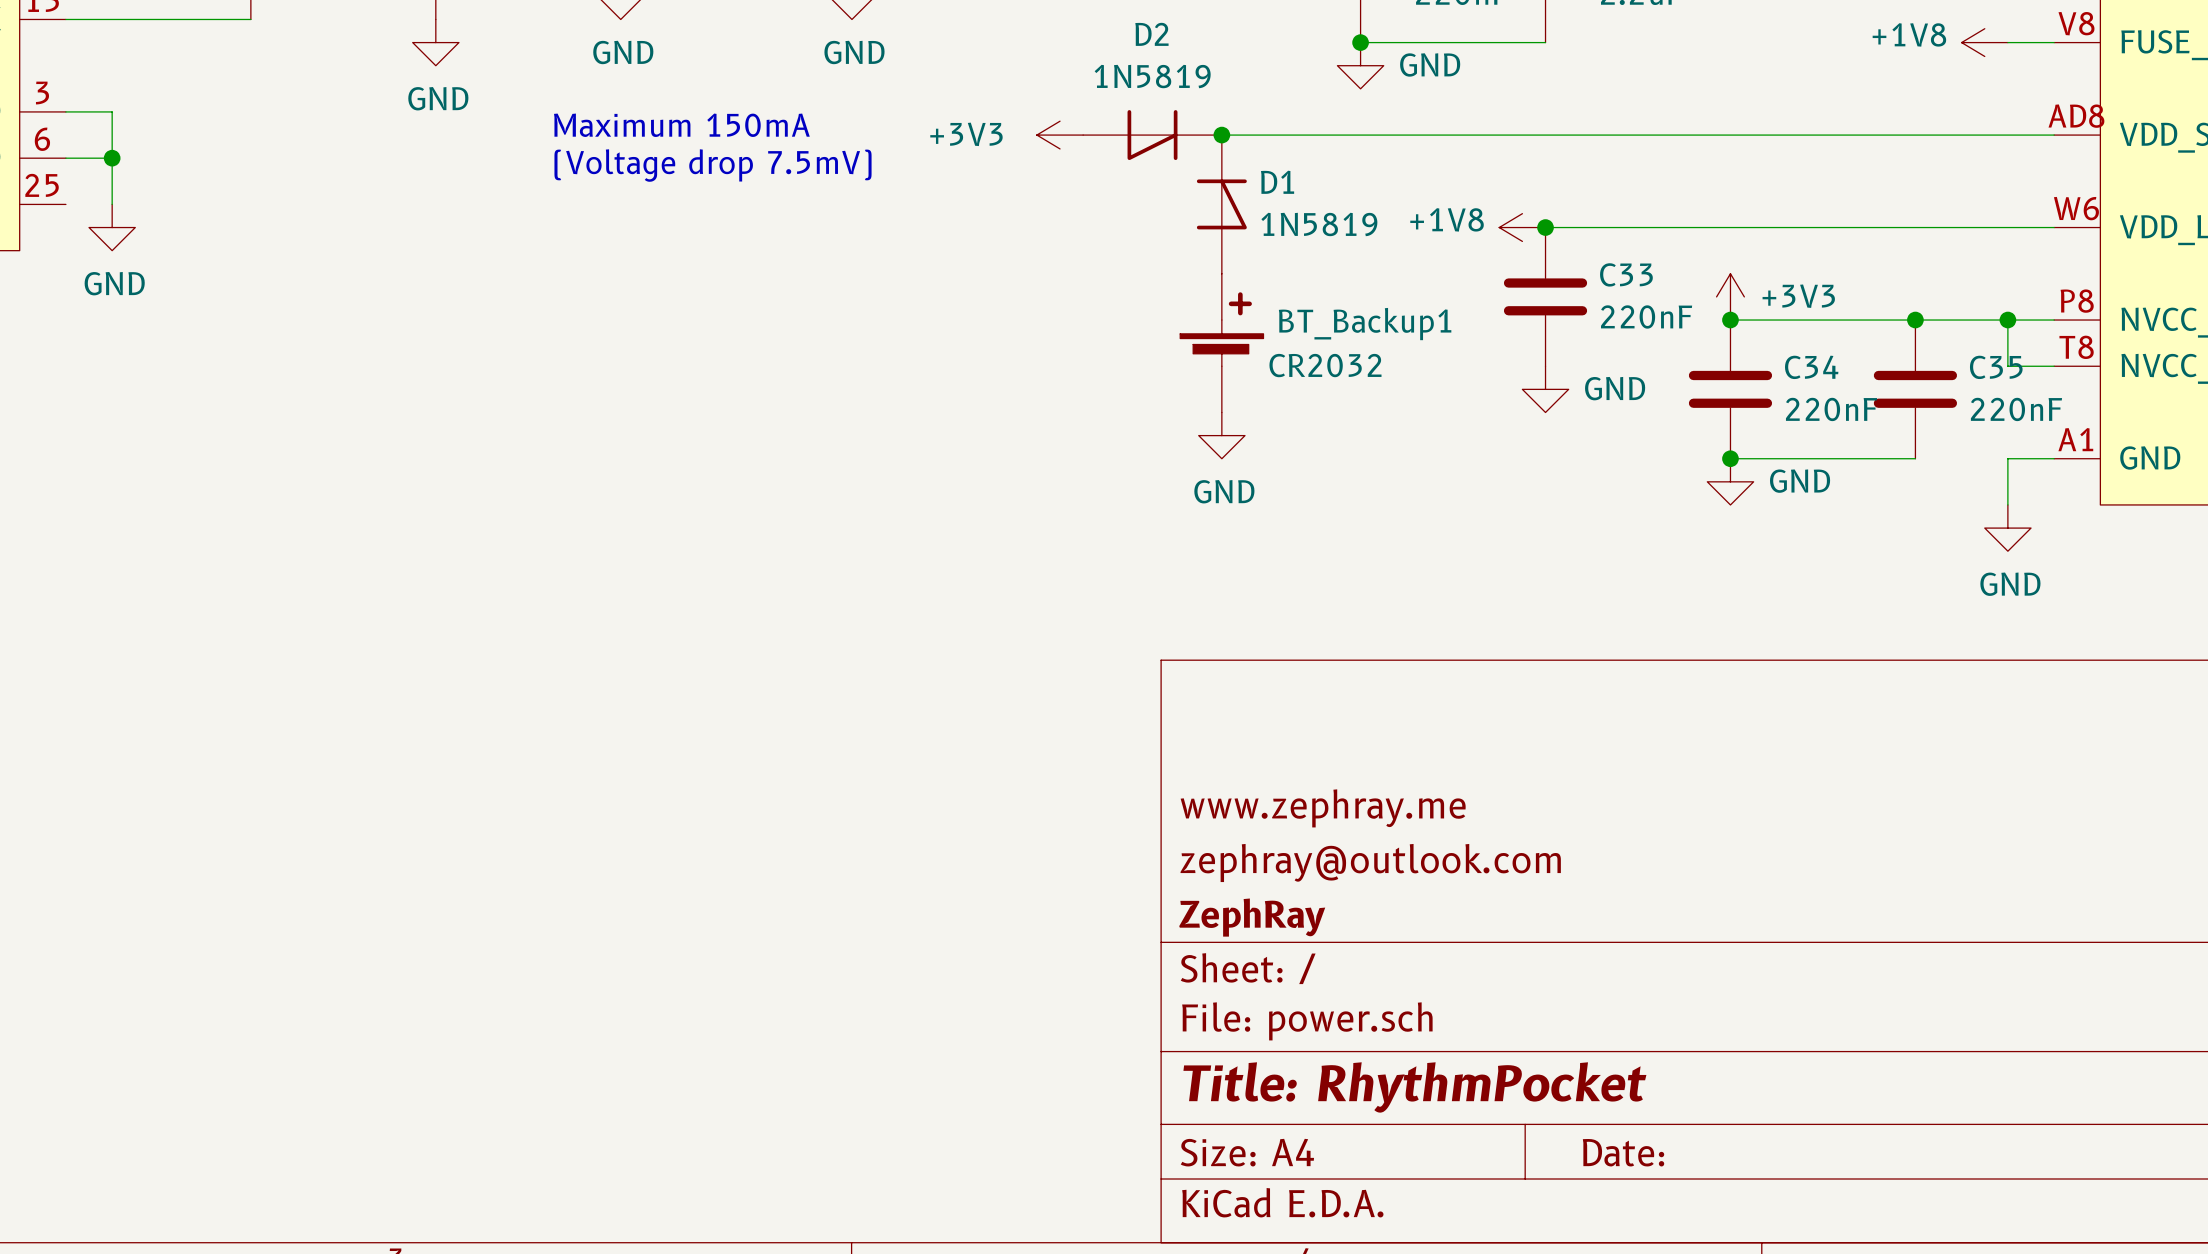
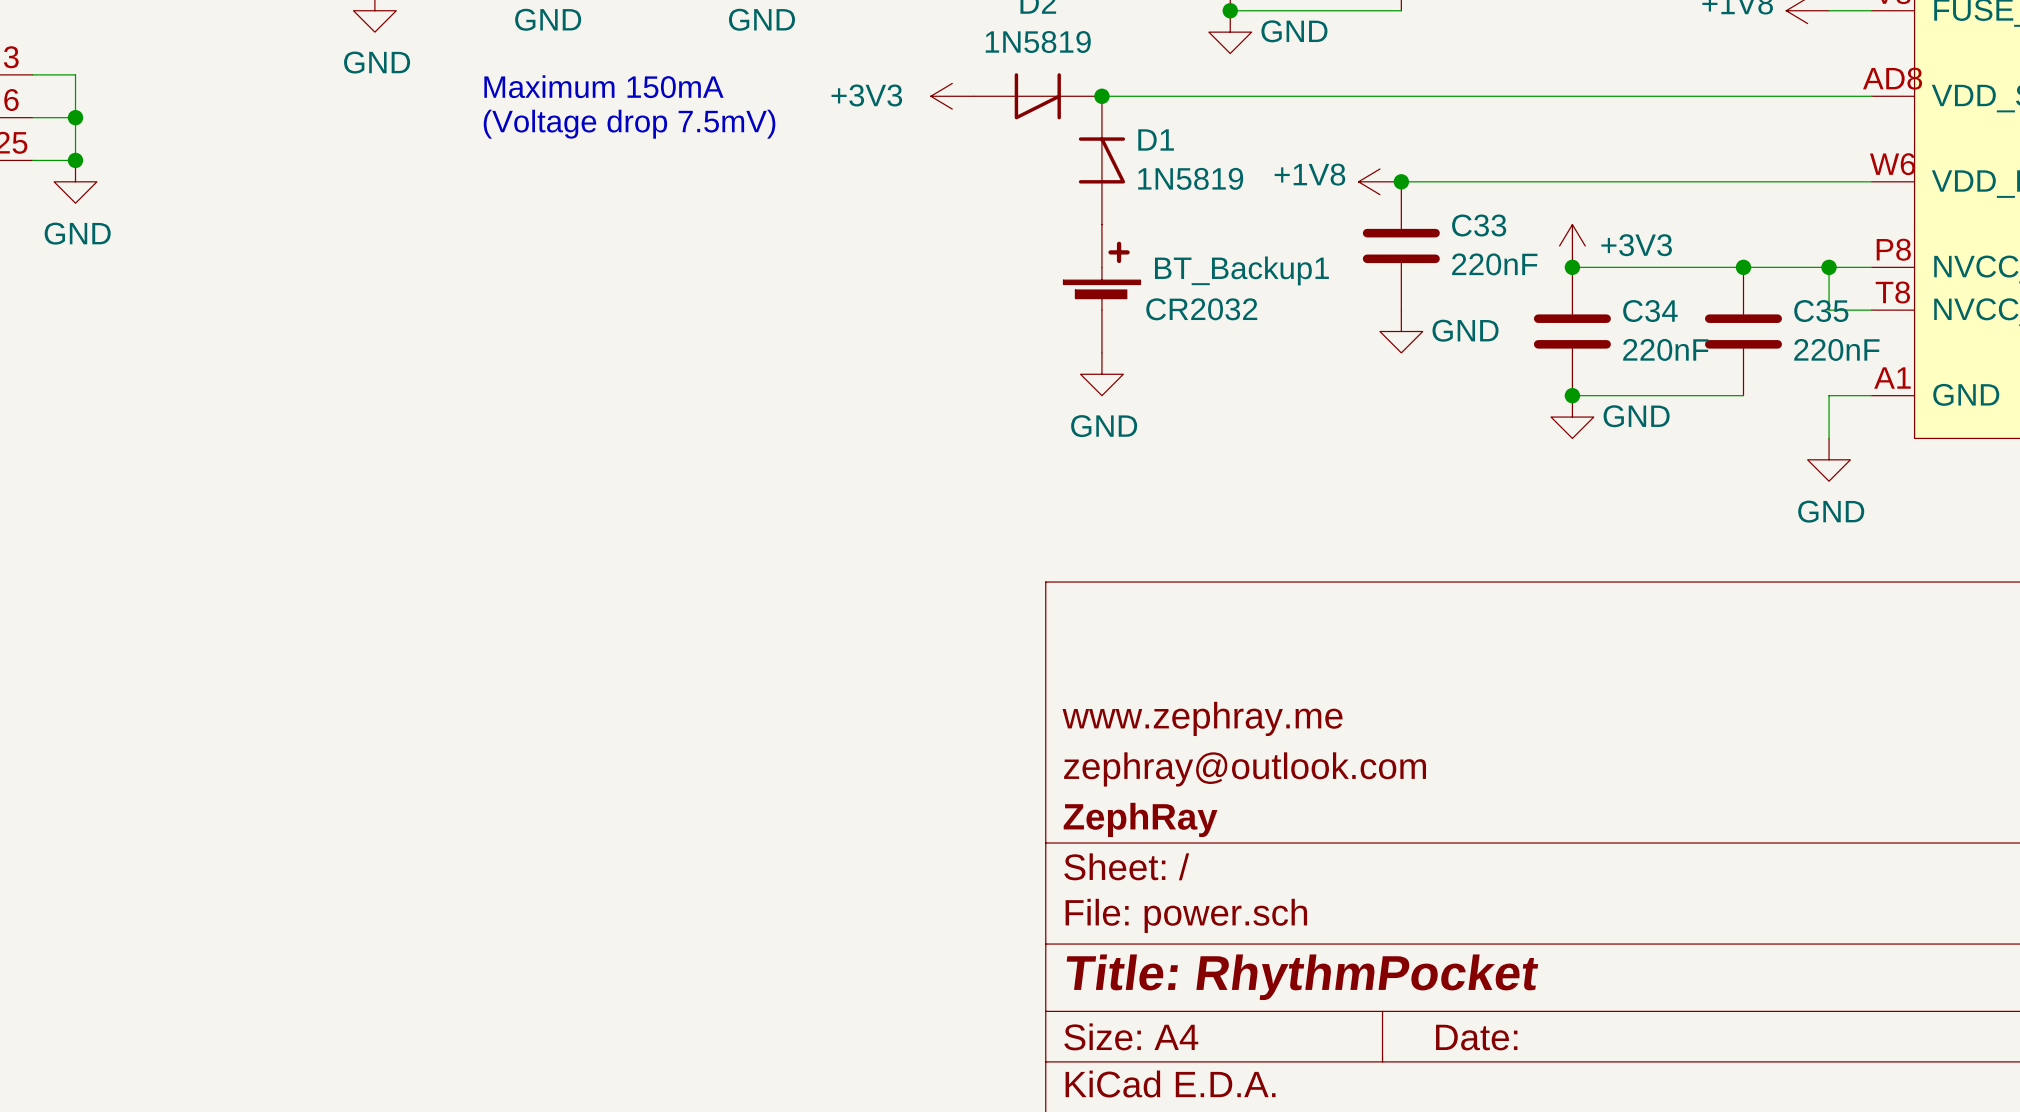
wire: none -> (32, 160) (75, 160)
junction: none -> (75, 160)

